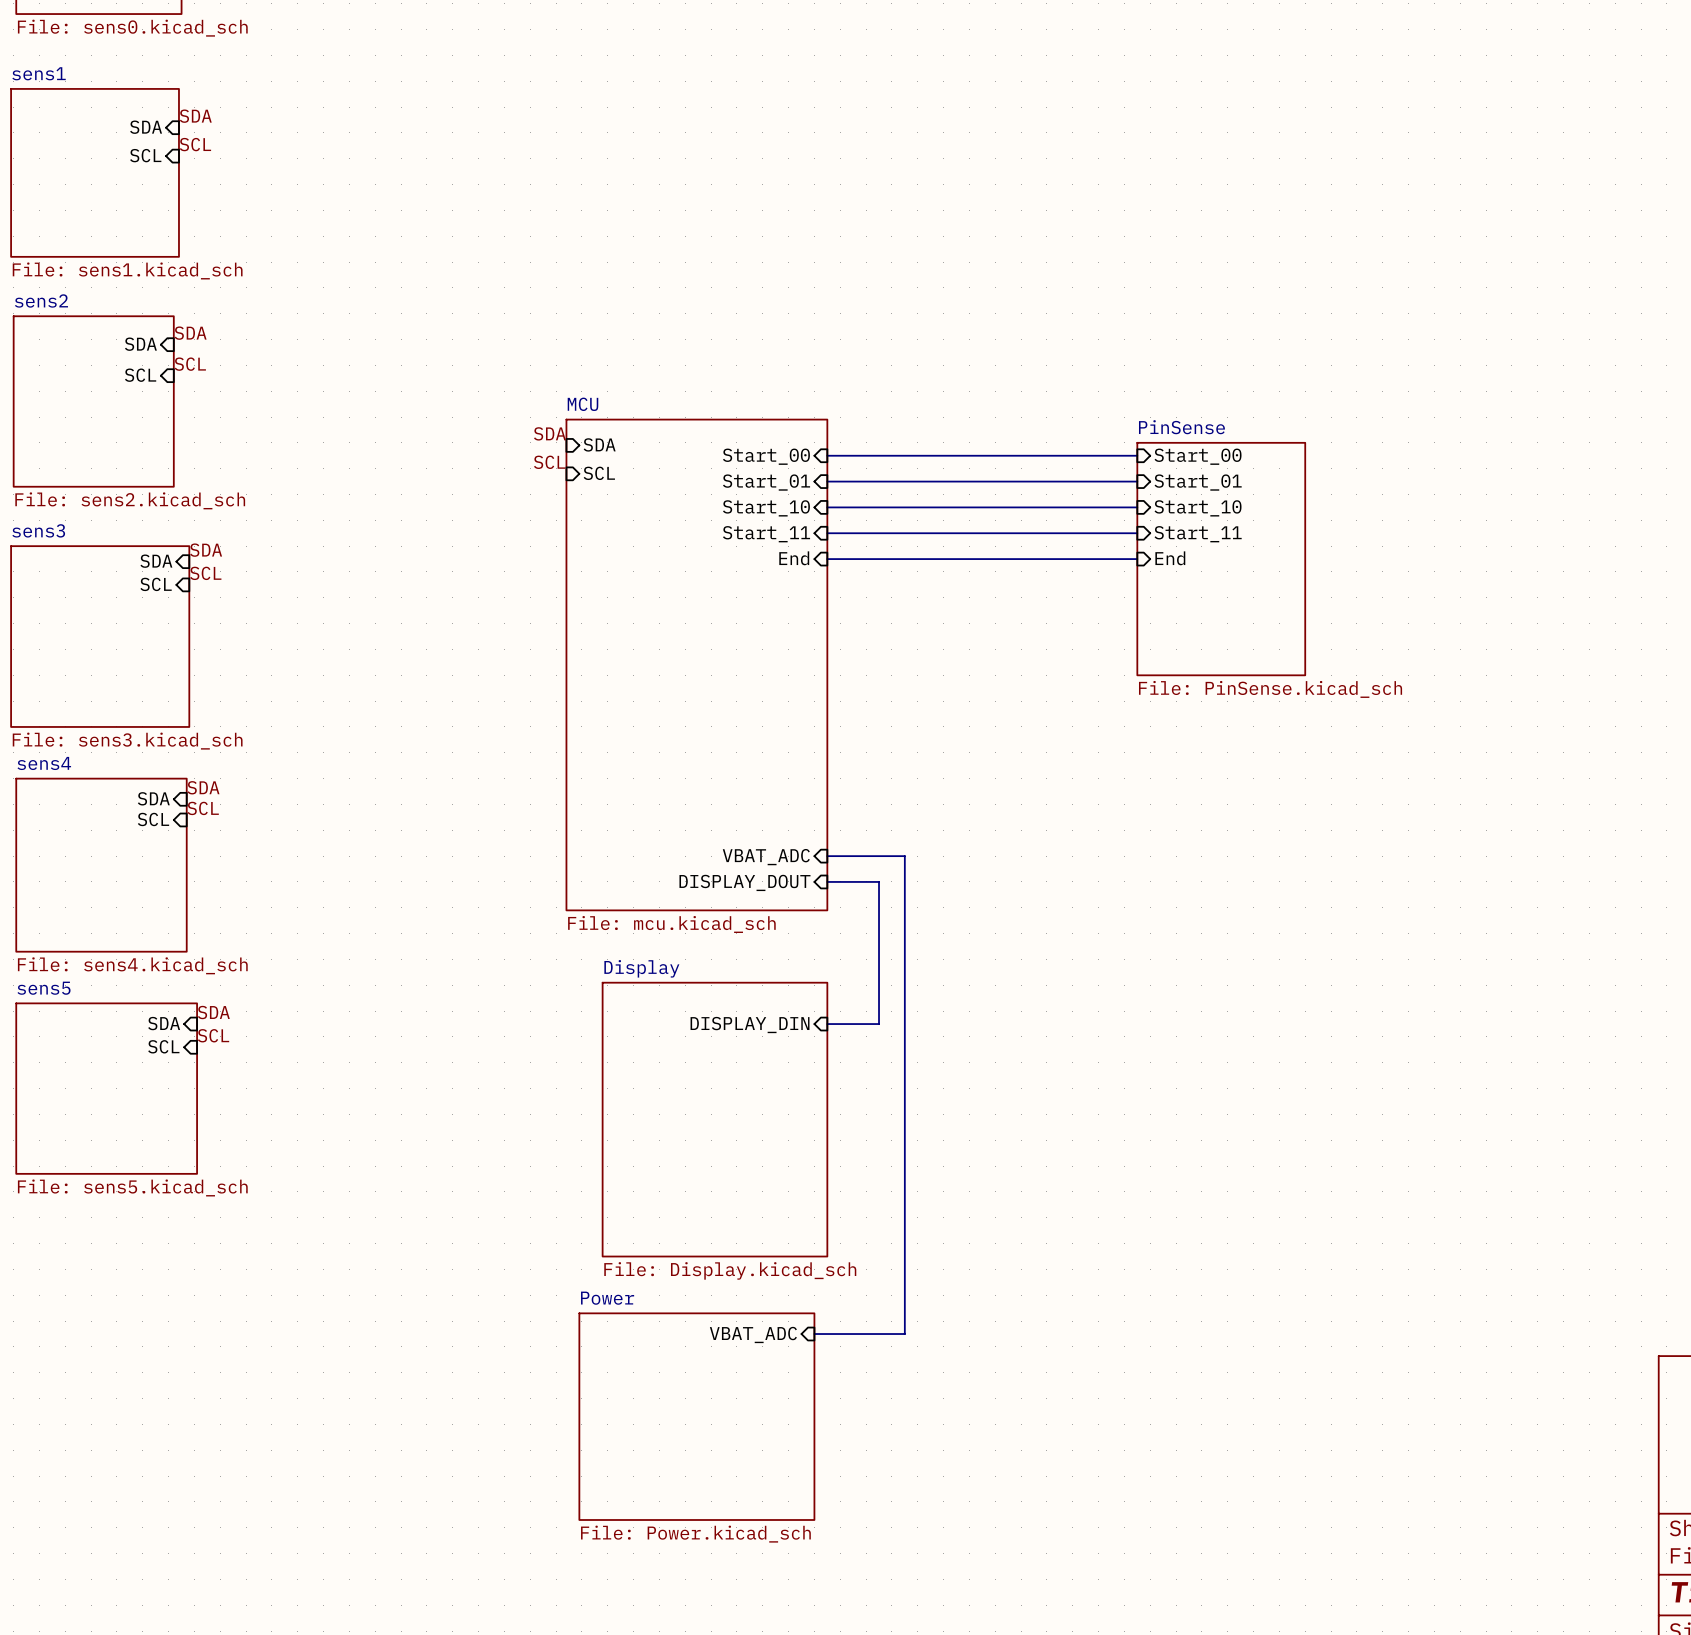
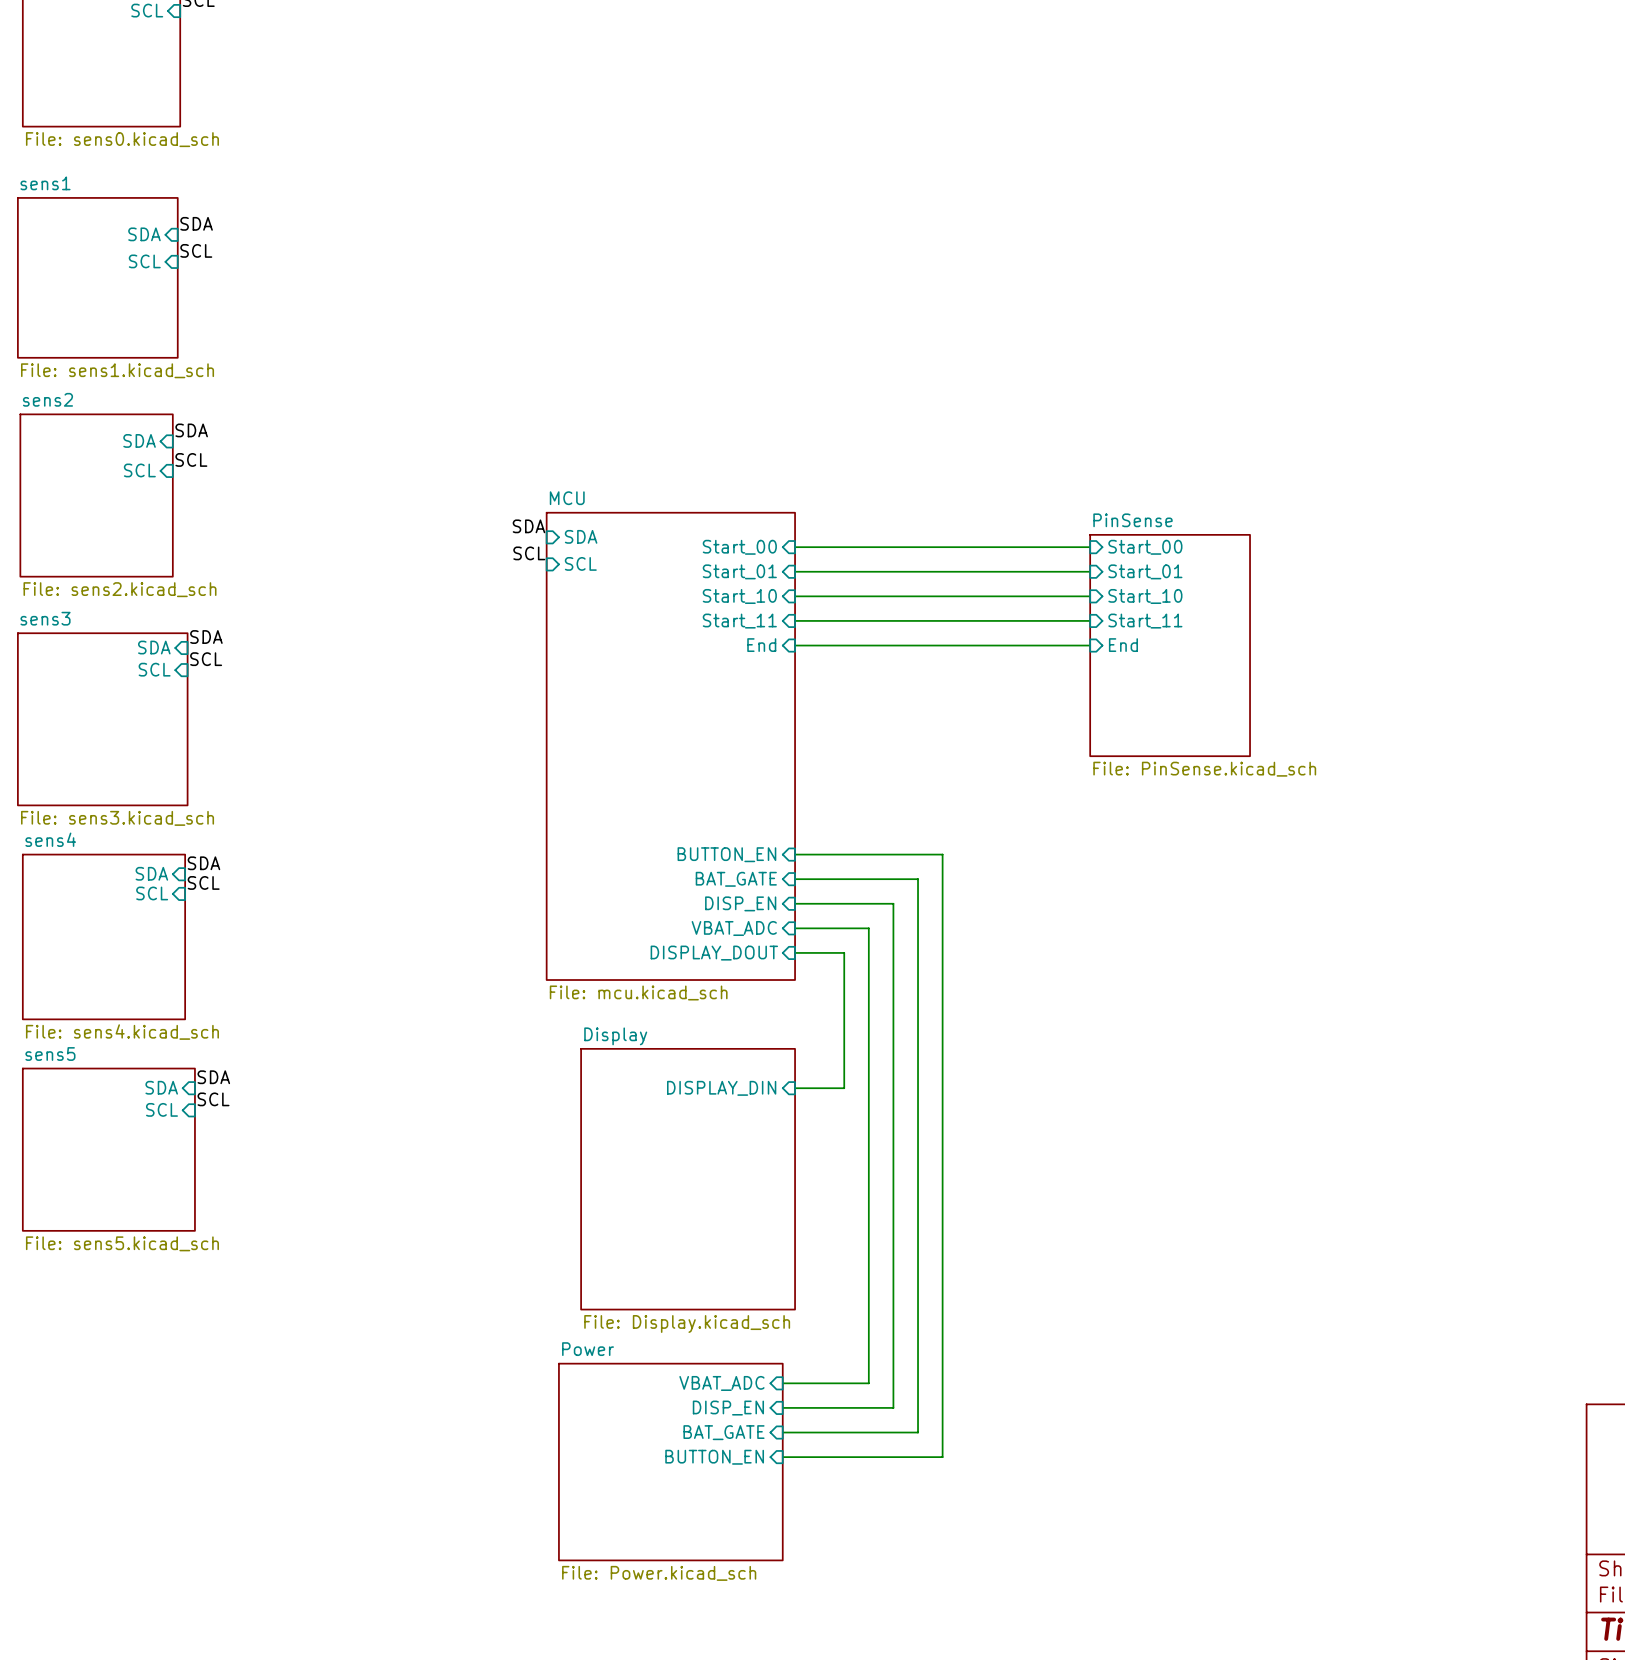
wire: none -> (795, 854) (942, 854) (942, 1457) (782, 1457)
sheet pin: none -> BUTTON_EN (726, 854)
wire: none -> (795, 879) (918, 879) (918, 1432) (782, 1432)
sheet pin: none -> BAT_GATE (736, 879)
wire: none -> (795, 903) (893, 903) (893, 1407) (782, 1407)
sheet pin: none -> DISP_EN (740, 903)
sheet pin: none -> DISP_EN (728, 1408)
sheet pin: none -> BAT_GATE (724, 1432)
sheet pin: none -> BUTTON_EN (714, 1457)

